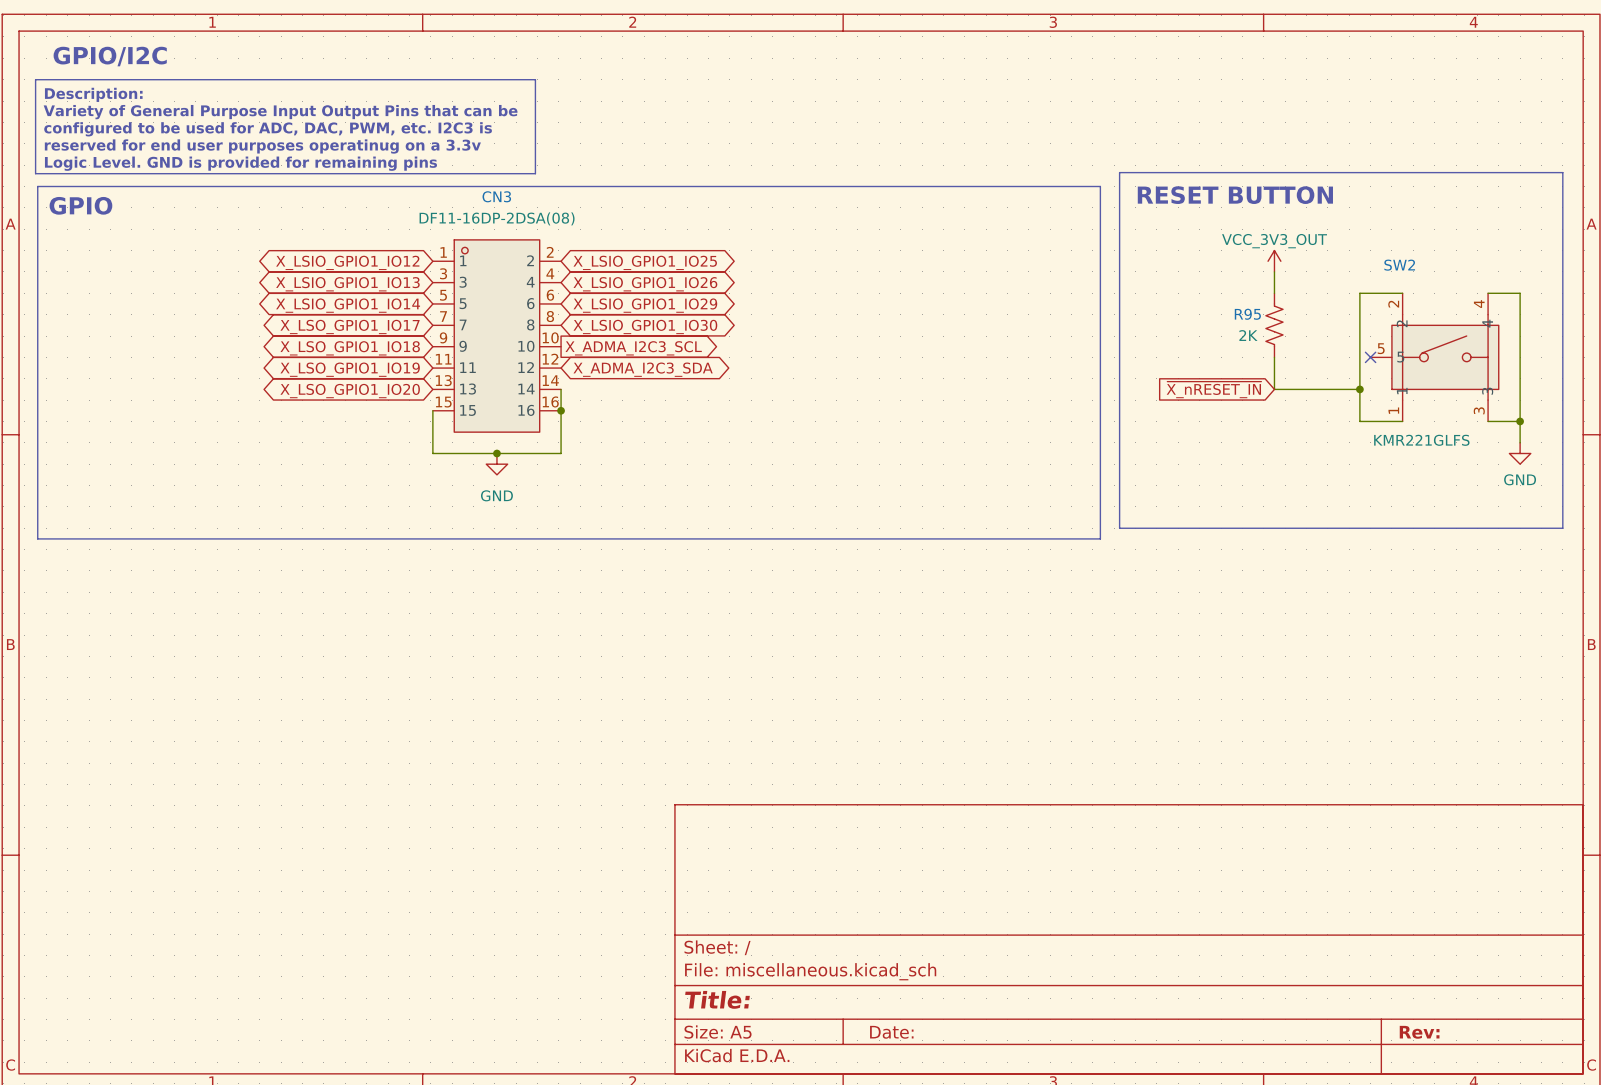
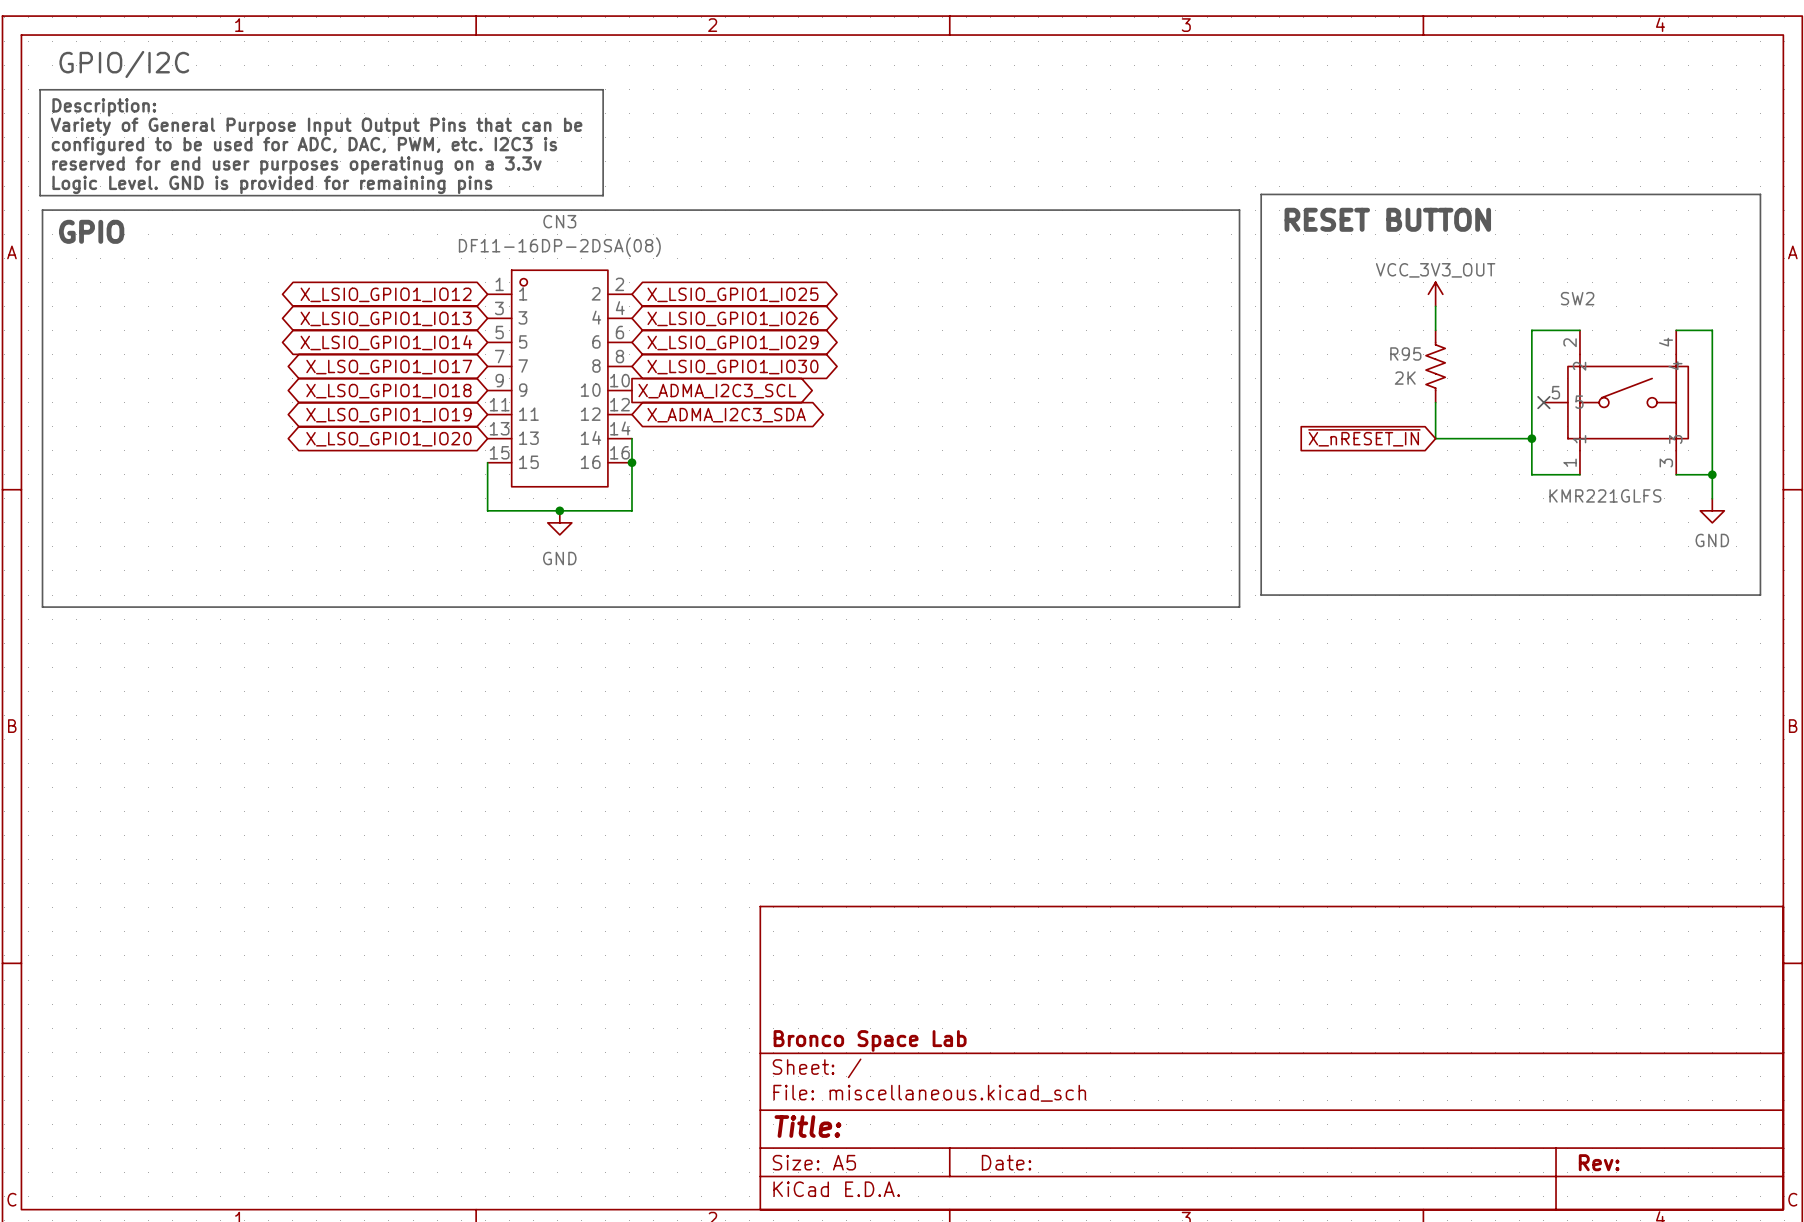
title block: none -> Bronco Space Lab (870, 1040)

